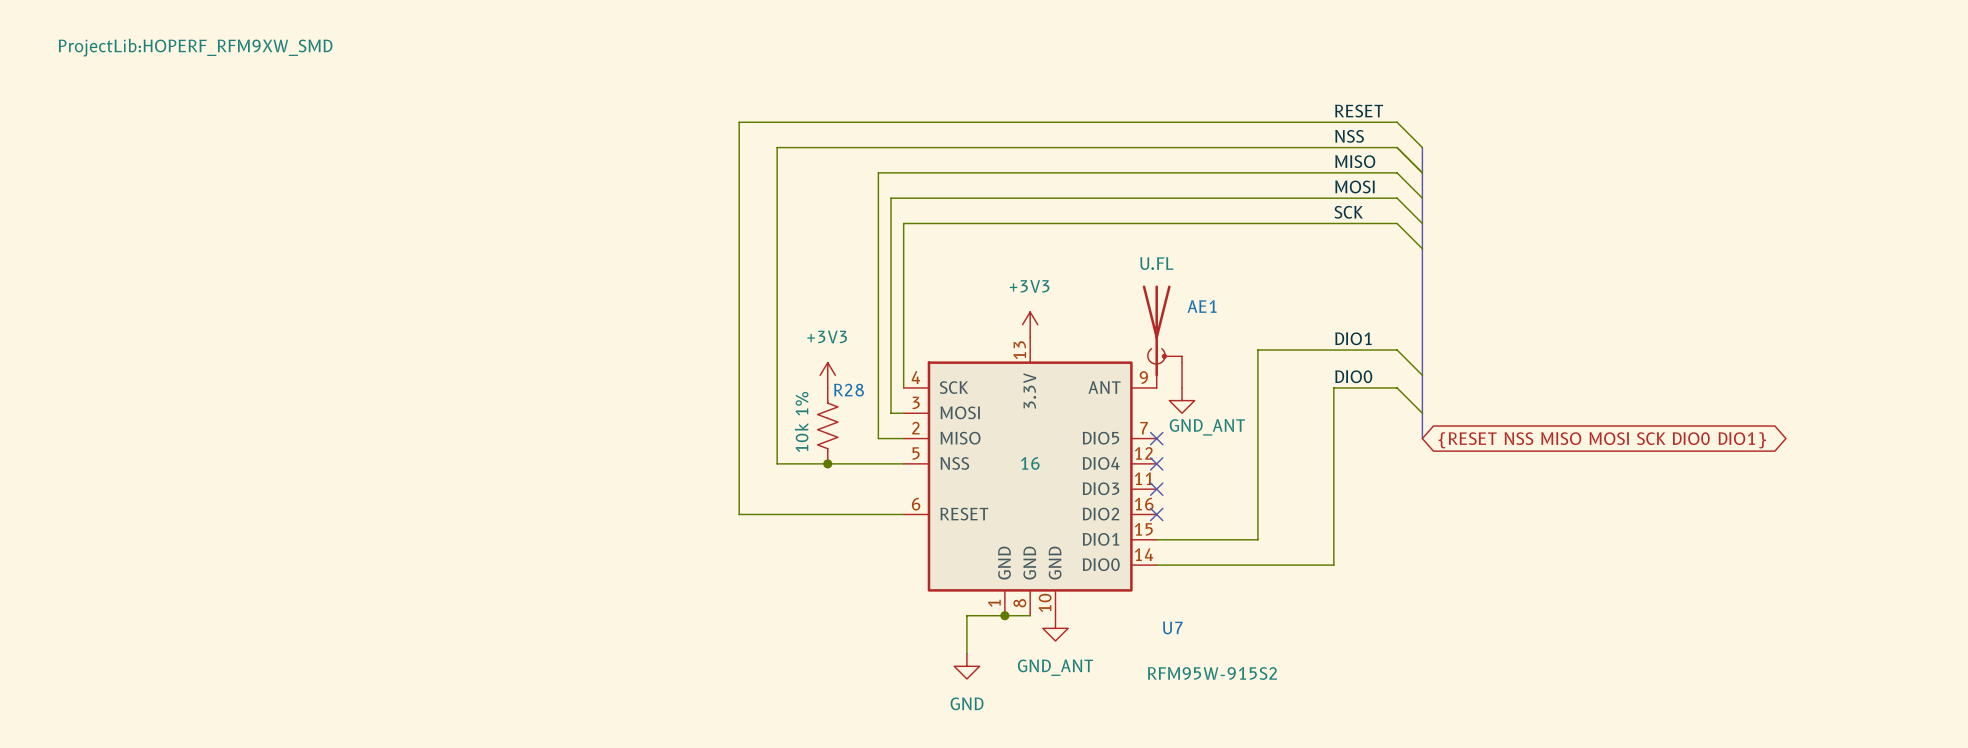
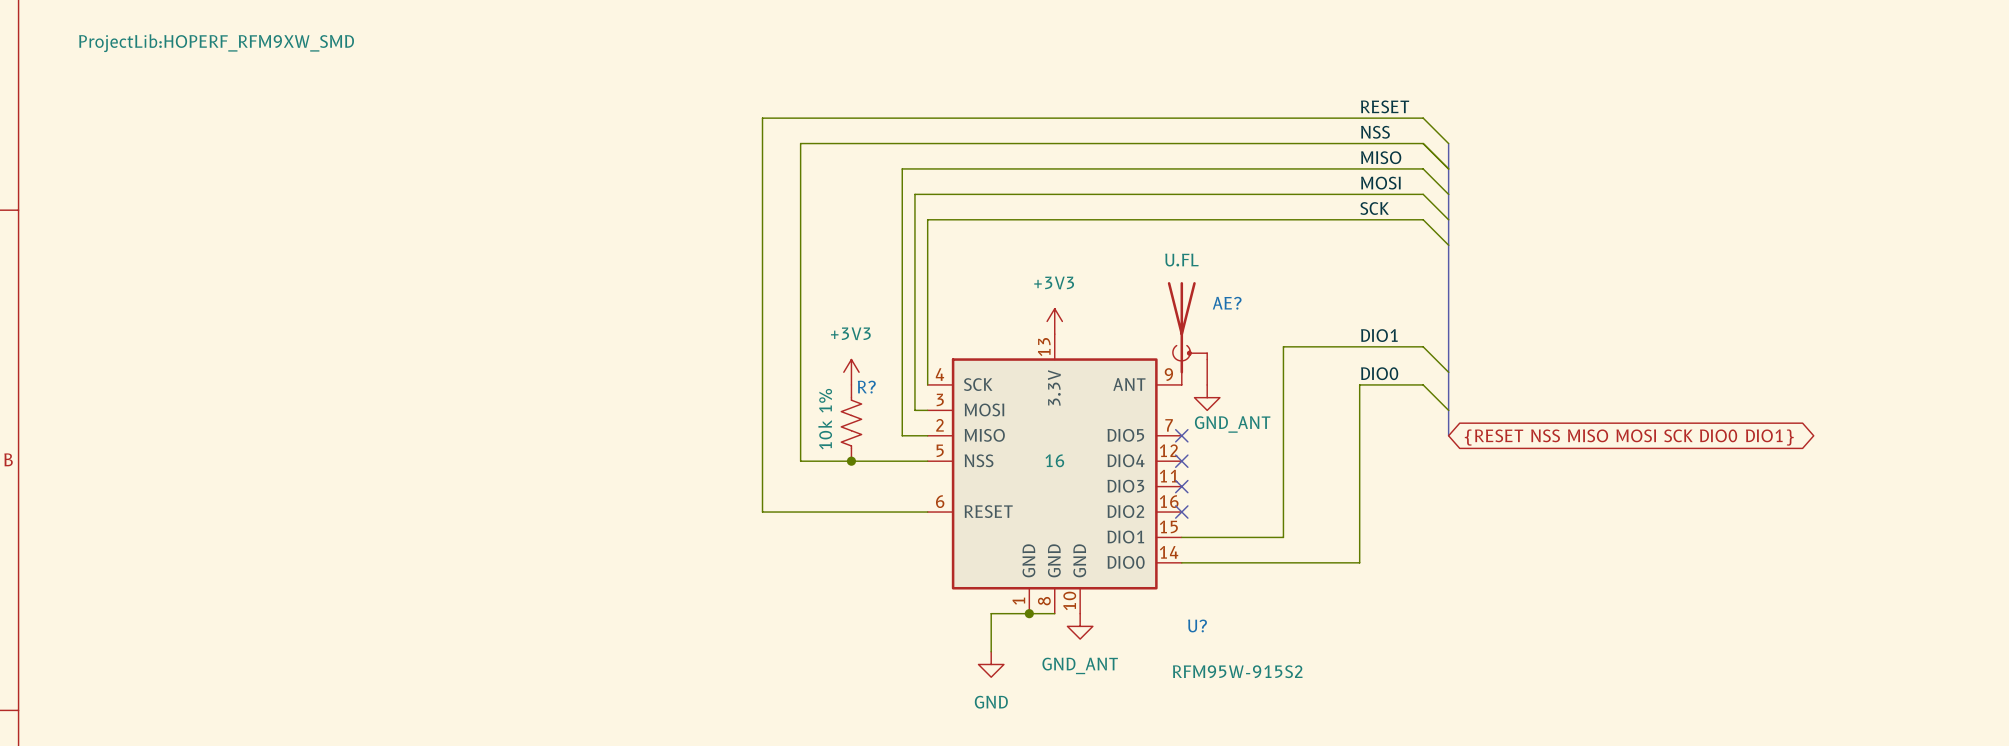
AE1 name: AE1 (1202, 306) -> AE? (1227, 303)
R28 name: R28 (848, 390) -> R? (866, 387)
U7 name: U7 (1172, 627) -> U? (1197, 625)

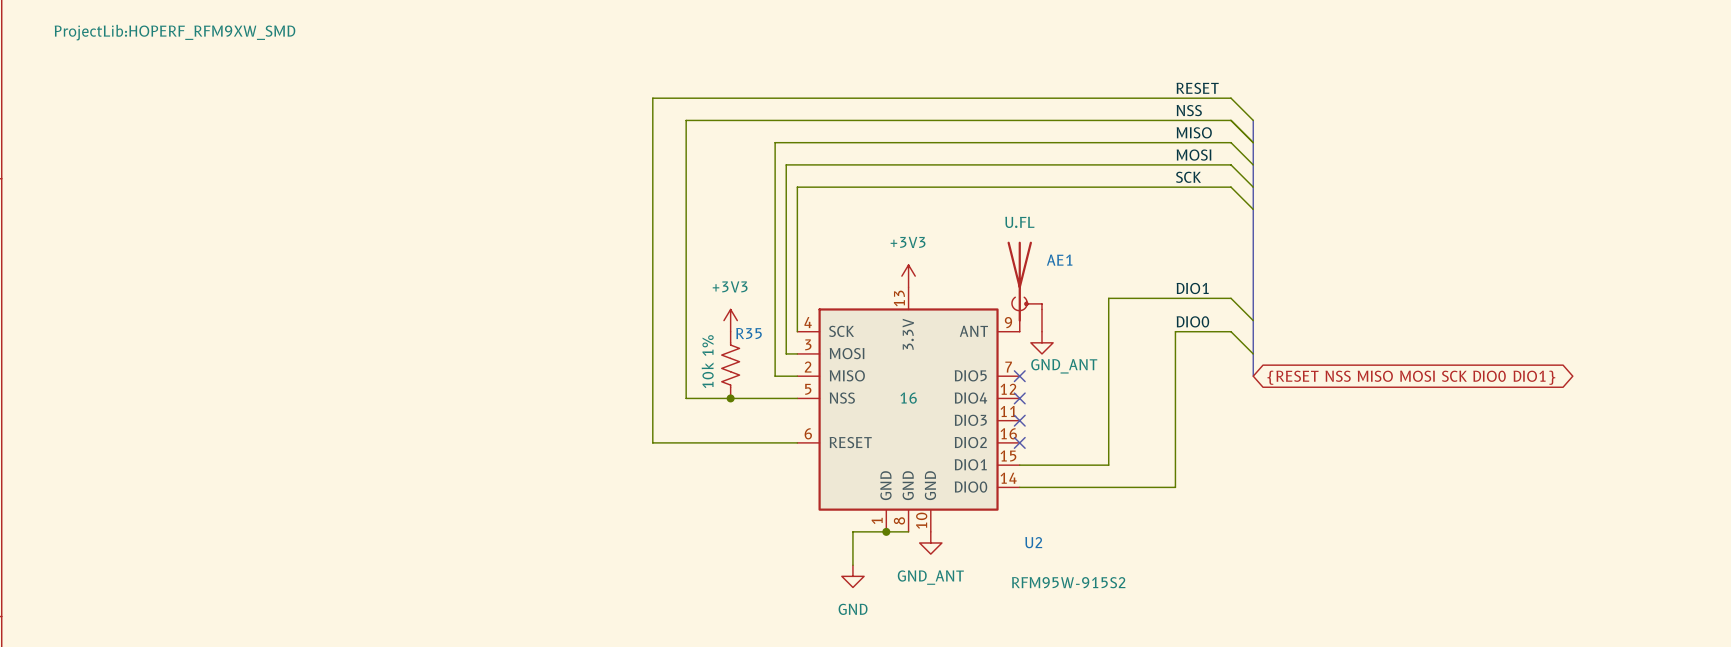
AE? name: AE? (1227, 303) -> AE1 (1059, 260)
R? name: R? (866, 387) -> R35 (749, 333)
U? name: U? (1197, 625) -> U2 (1033, 542)

